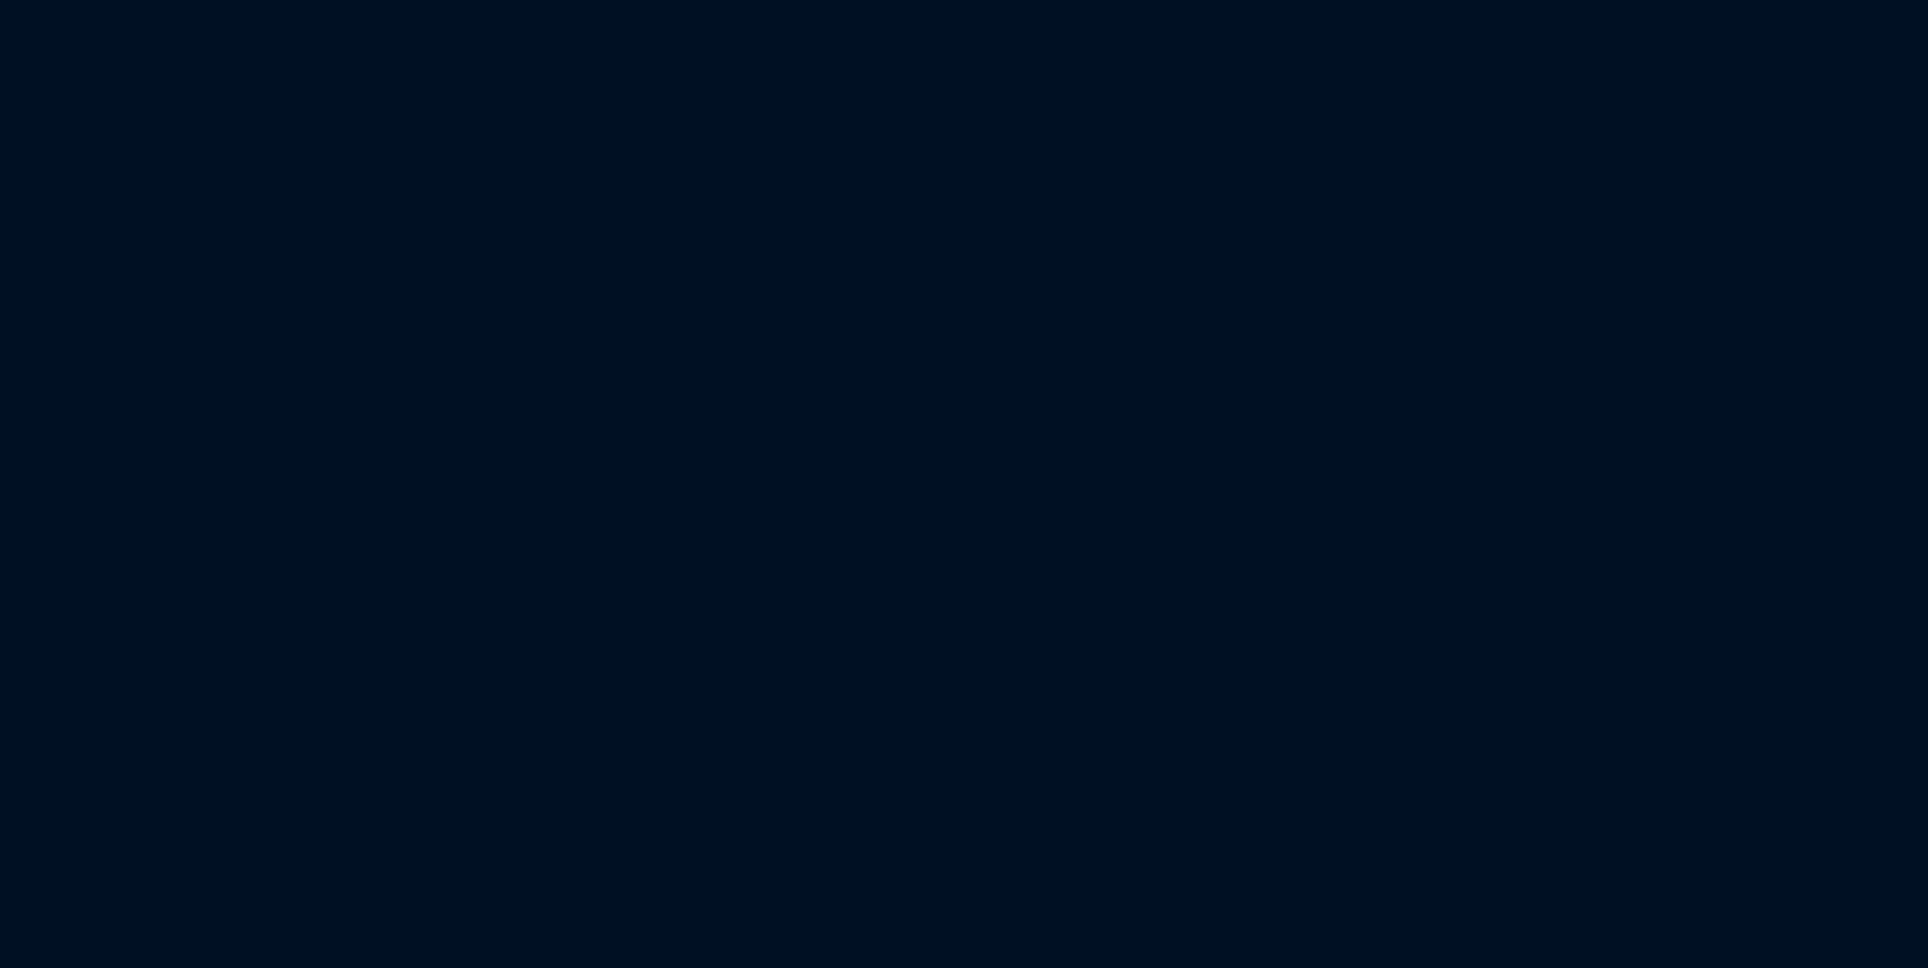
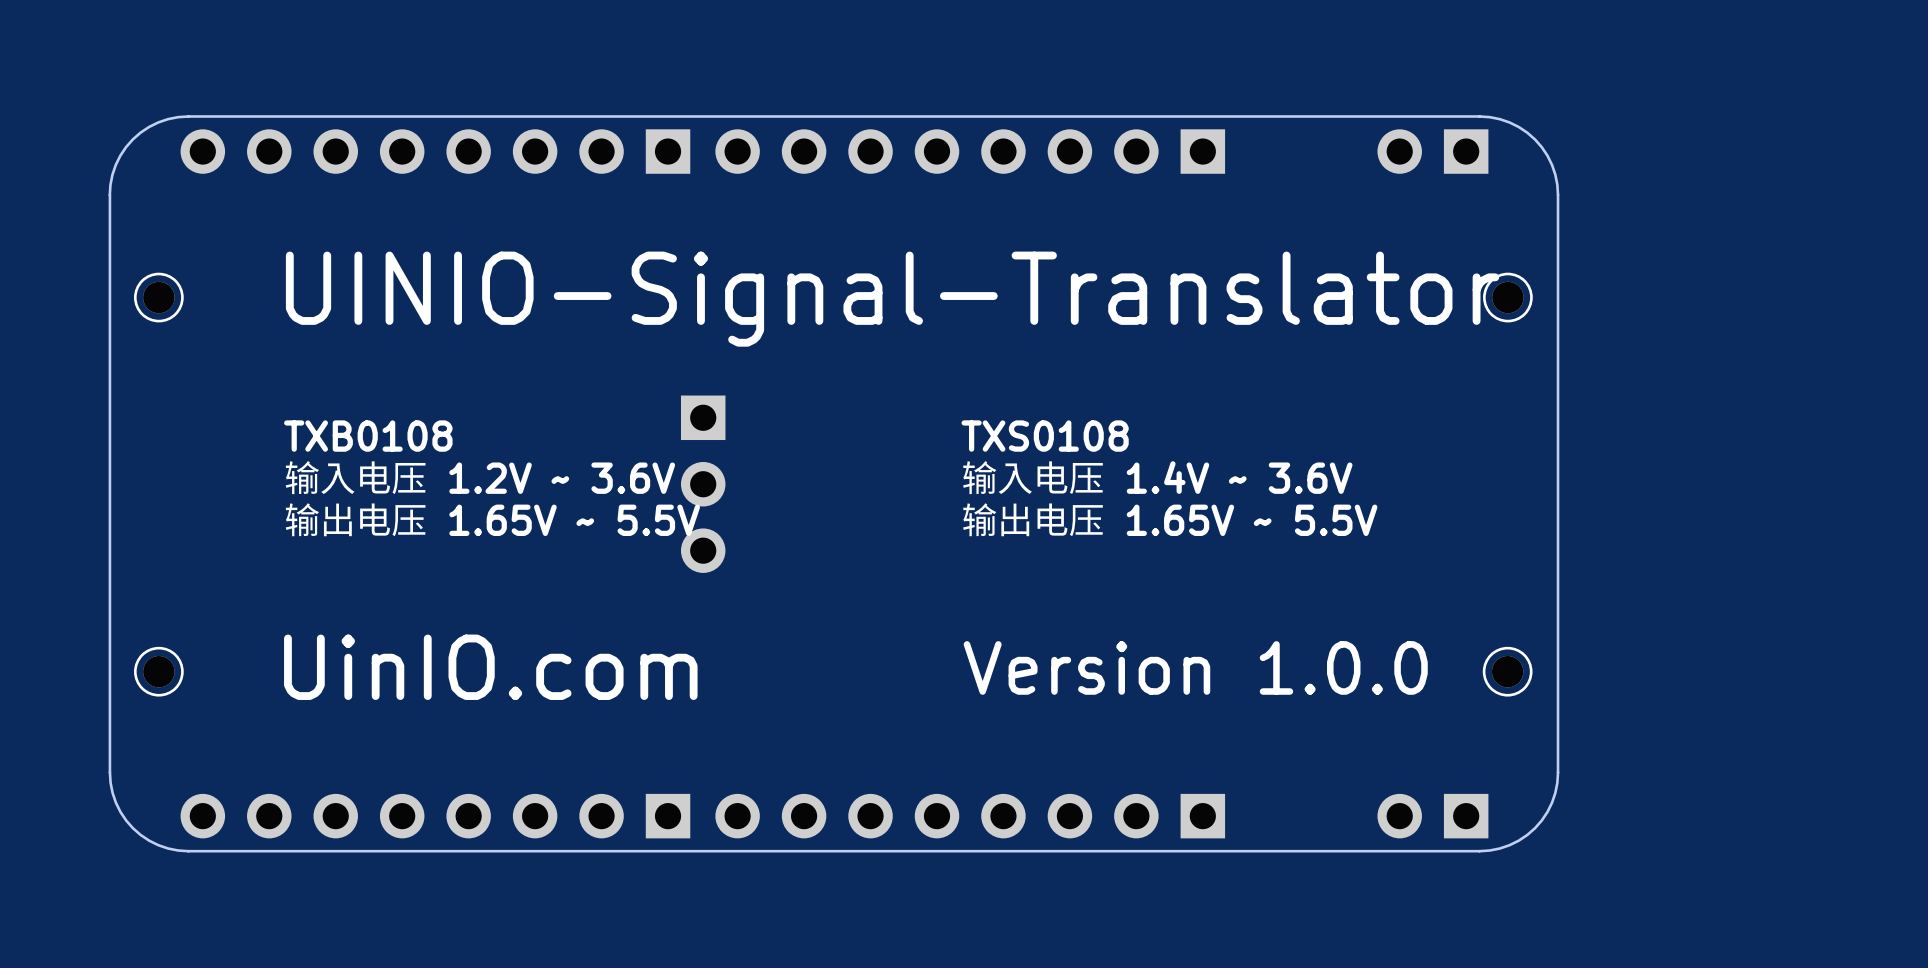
board edge: none -> (1479, 116) (188, 116) (167, 119) (149, 127) (132, 139) (120, 155) (112, 174) (109, 194) (109, 772) (112, 793) (120, 811) (132, 828) (149, 840) (168, 848) (188, 851) (1479, 851) (1499, 848) (1518, 840) (1535, 828) (1547, 811) (1555, 793) (1558, 772) (1558, 194) (1552, 164) (1535, 139) (1509, 122) (1479, 116)
part: none -> (435, 151)
part: none -> (970, 151)
part: none -> (1432, 151)
text: none -> UINIO-Signal-Translator (892, 299)
part: none -> (158, 297)
part: none -> (1507, 297)
text: none -> TXB0108 (368, 436)
text: none -> TXS0108 (1045, 436)
text: none -> 输入电压 1.2V ~ 3.6V (479, 477)
text: none -> 输入电压 1.4V ~ 3.6V (1156, 477)
part: none -> (703, 484)
text: none -> 输出电压 1.65V ~ 5.5V (491, 519)
text: none -> 输出电压 1.65V ~ 5.5V (1168, 519)
text: none -> UinIO.com (490, 667)
text: none -> Version 1.0.0 (1195, 667)
part: none -> (158, 671)
part: none -> (1507, 671)
part: none -> (435, 816)
part: none -> (970, 816)
part: none -> (1432, 816)

